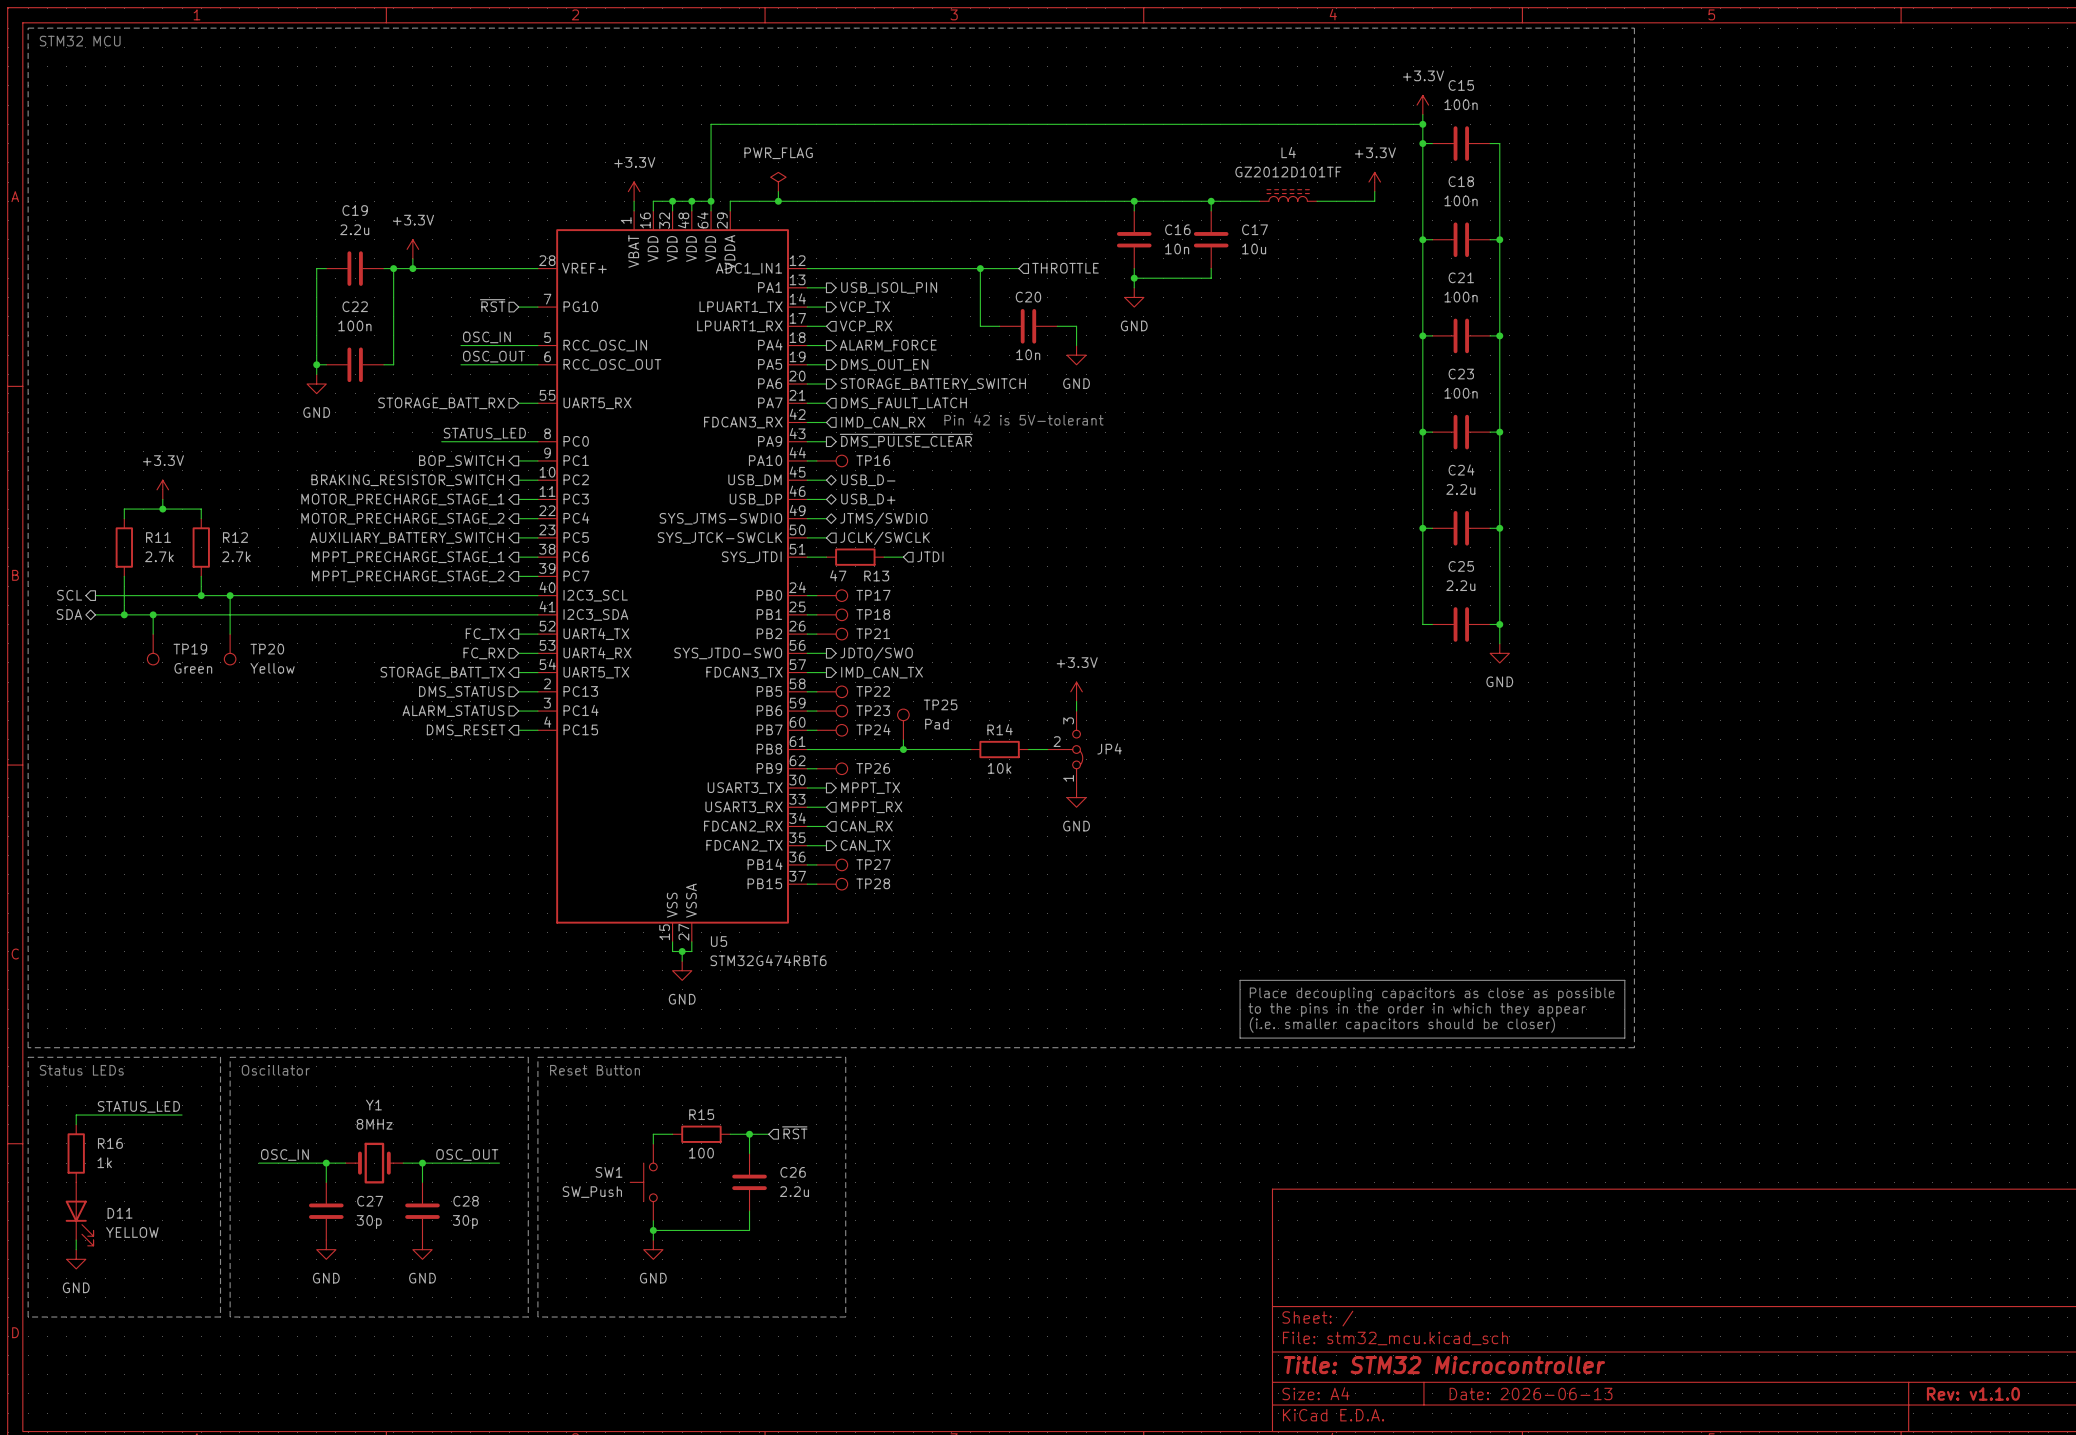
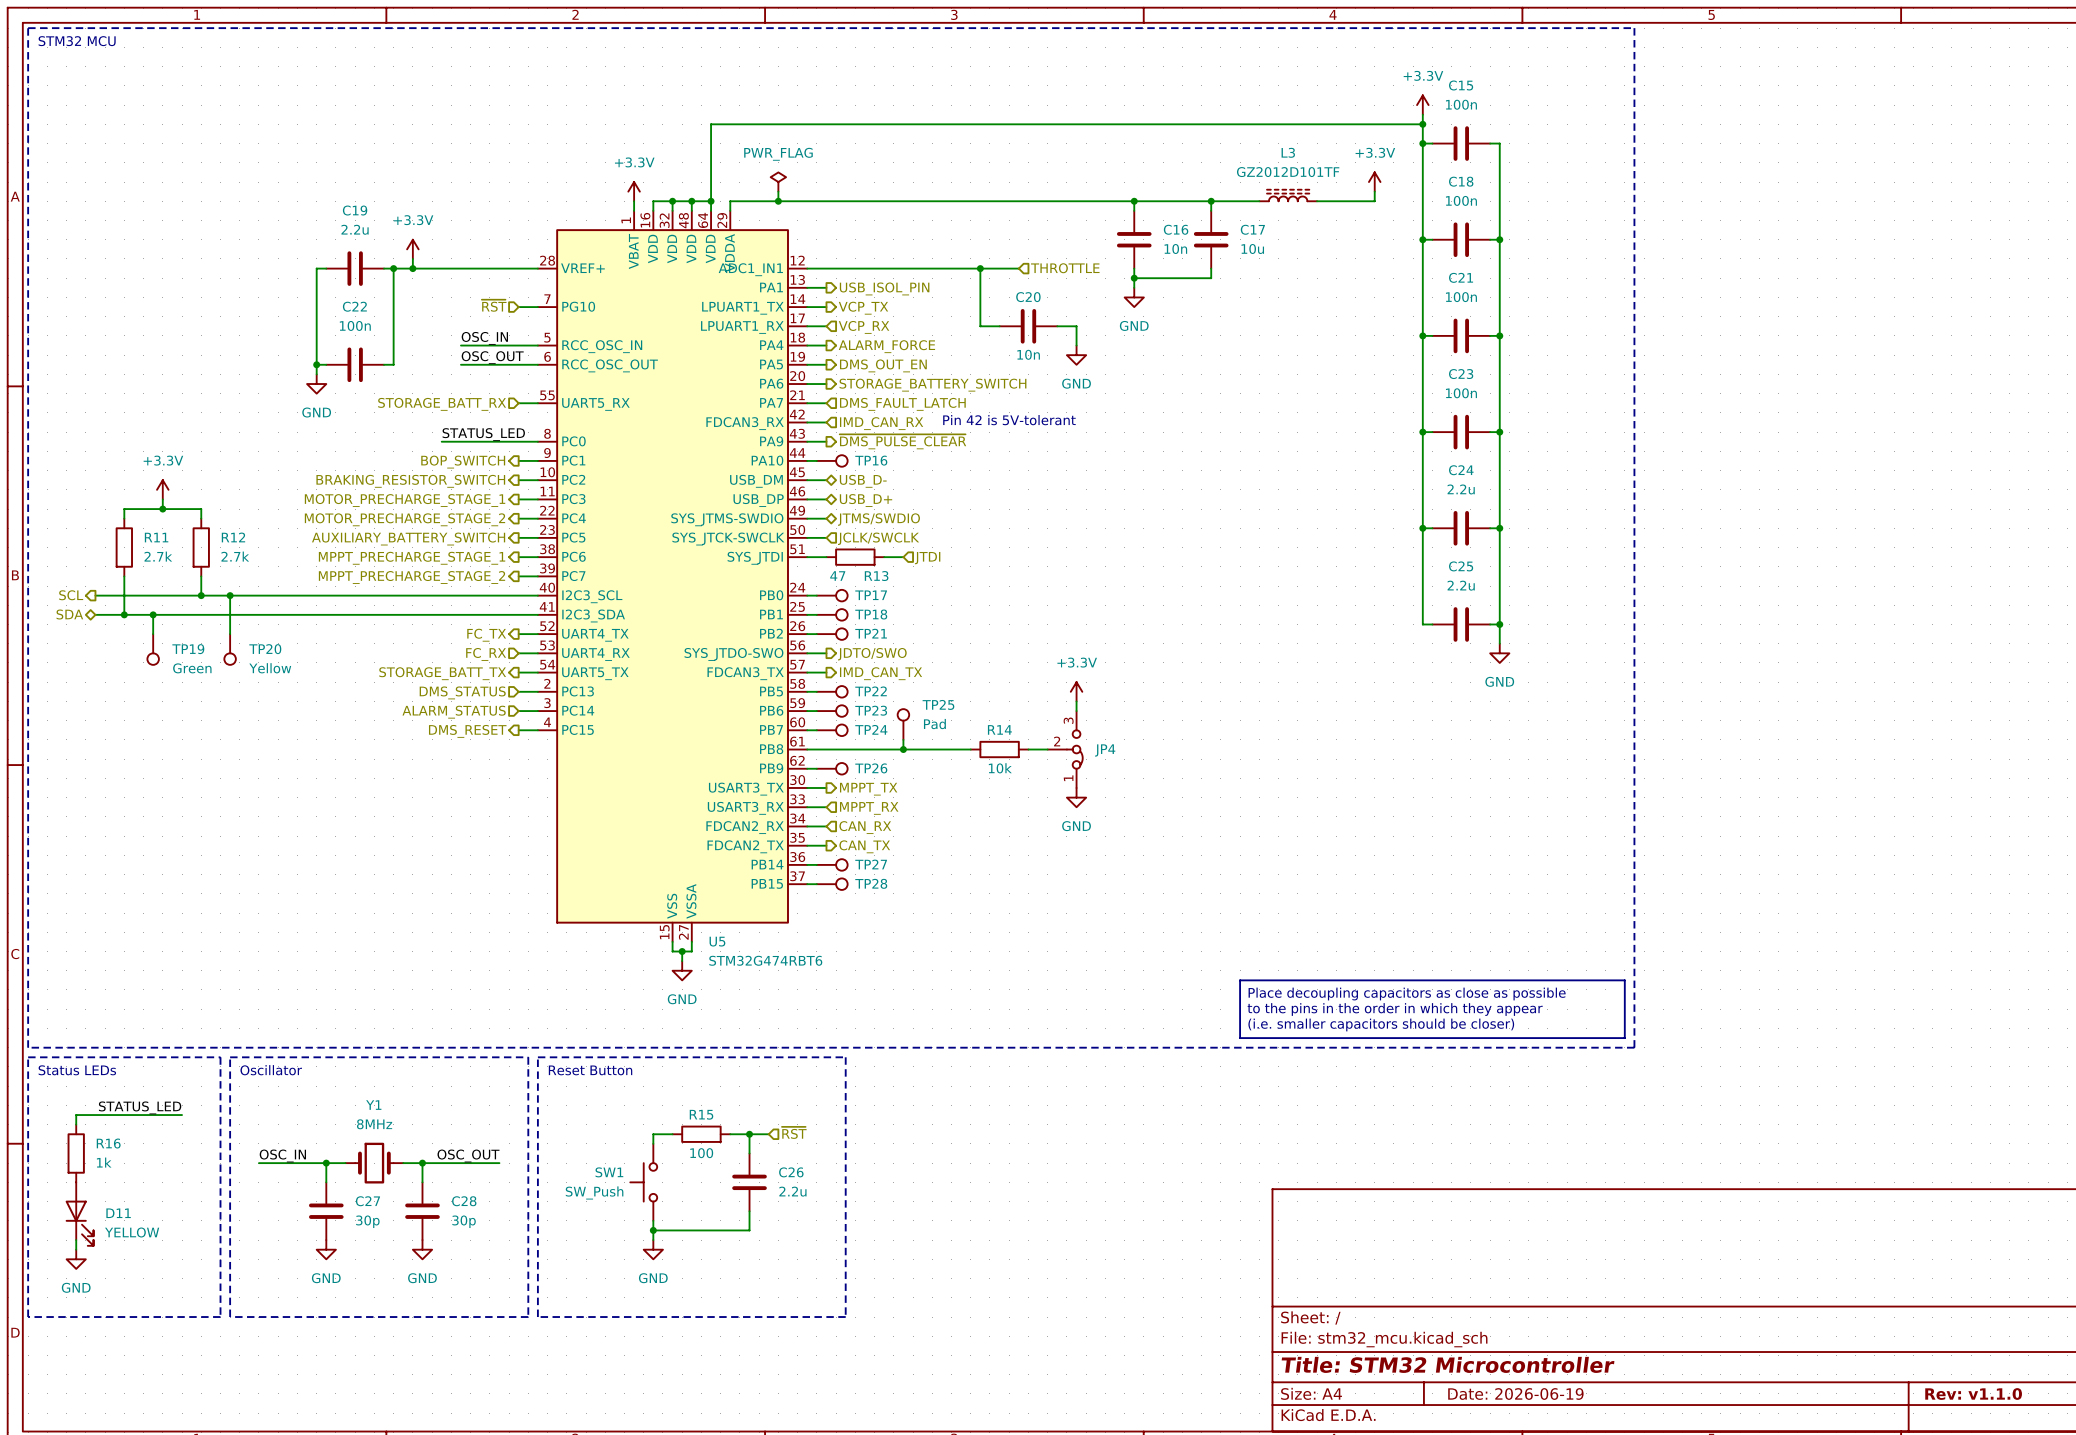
L4 name: L4 (1288, 152) -> L3 (1288, 152)
title block: Date: 2026-06-13 (1531, 1393) -> Date: 2026-06-19 (1515, 1394)

